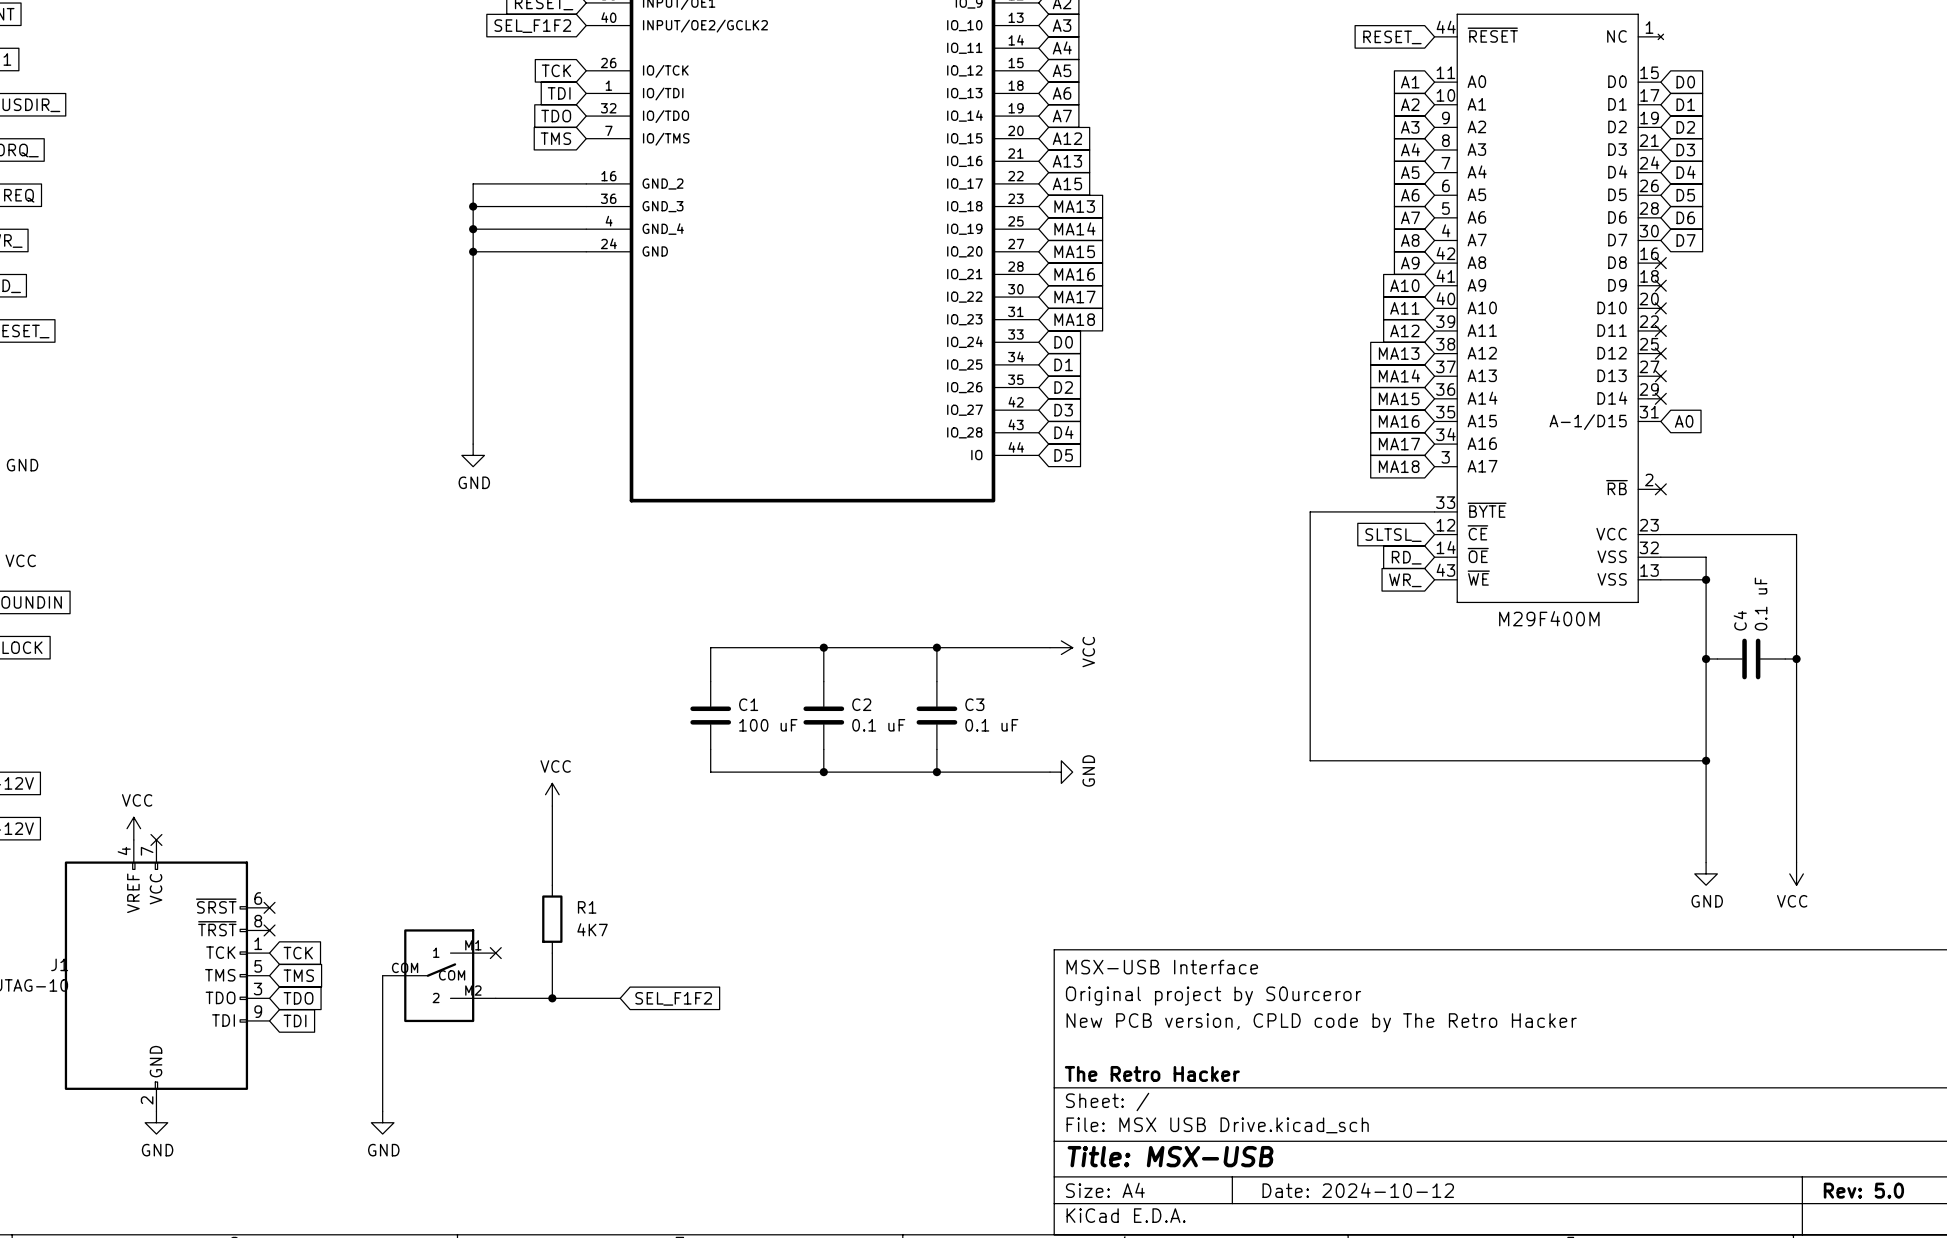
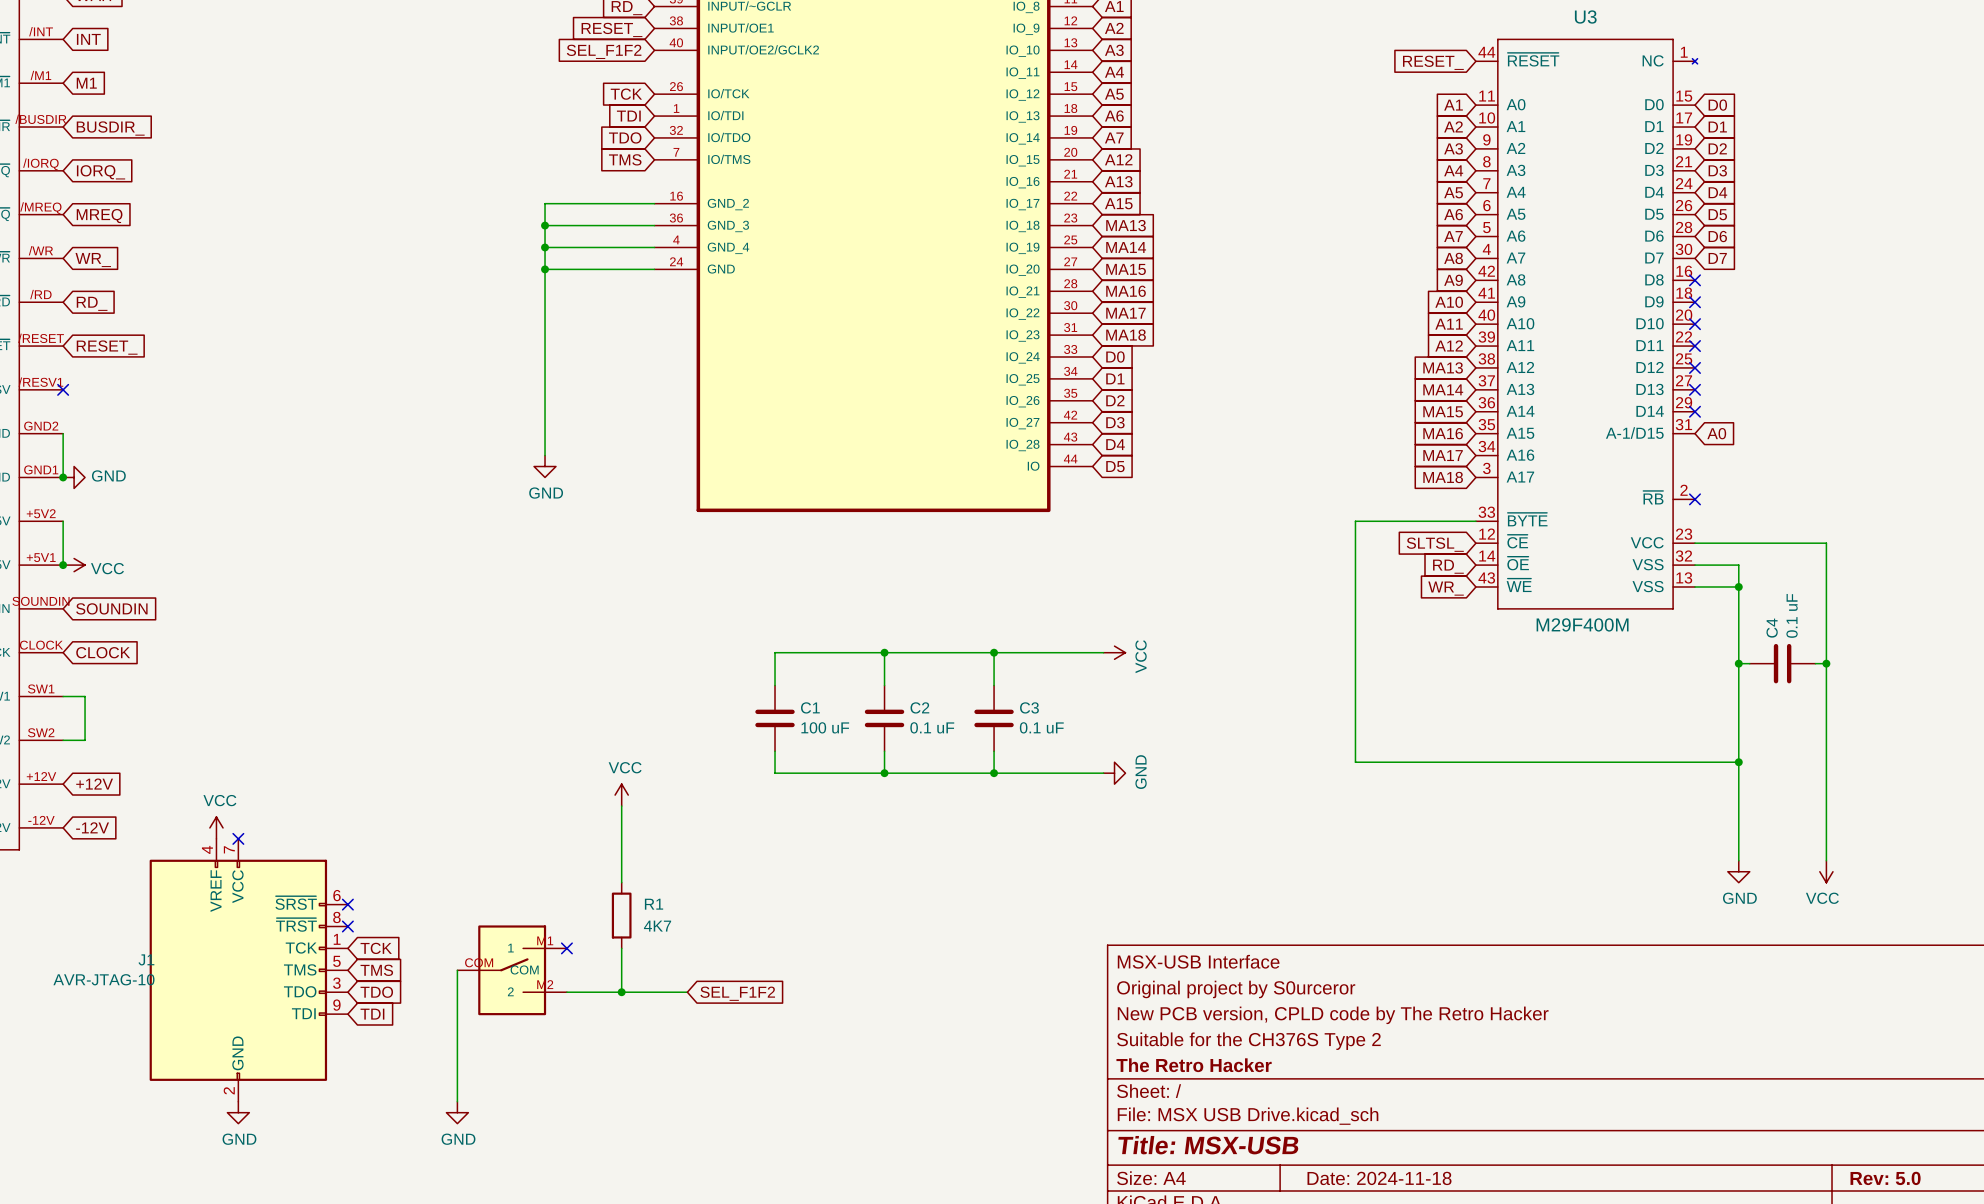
title block: none -> Suitable for the CH376S Type 2 (1248, 1041)
title block: Date: 2024-10-12 (1358, 1190) -> Date: 2024-11-18 (1379, 1178)

